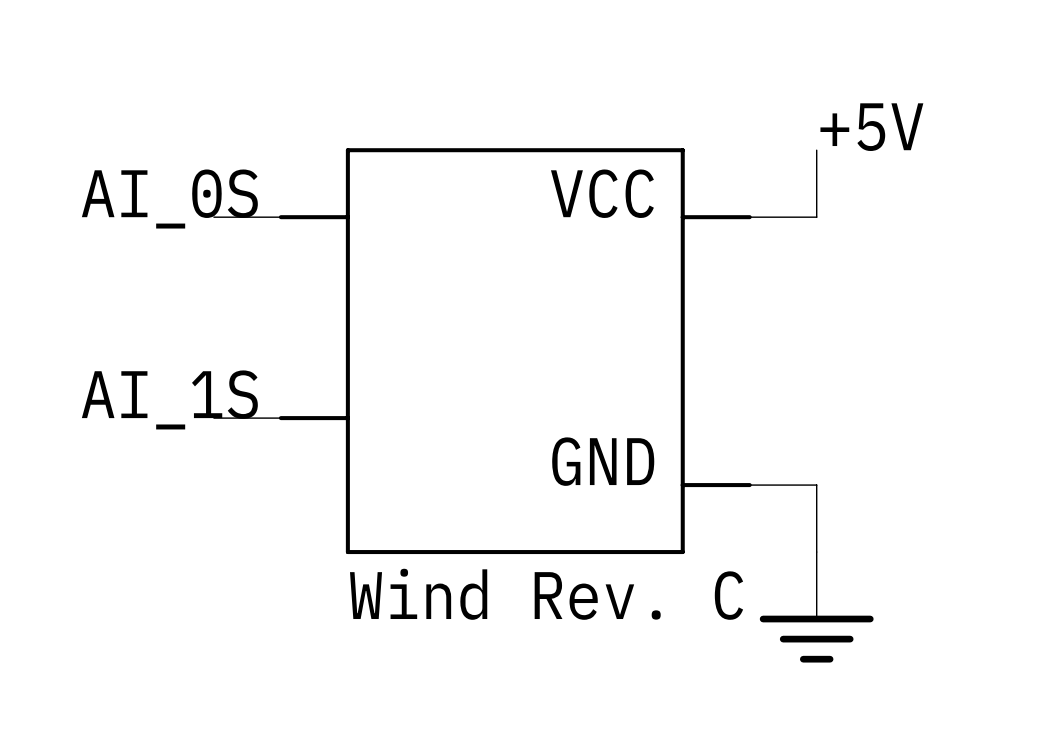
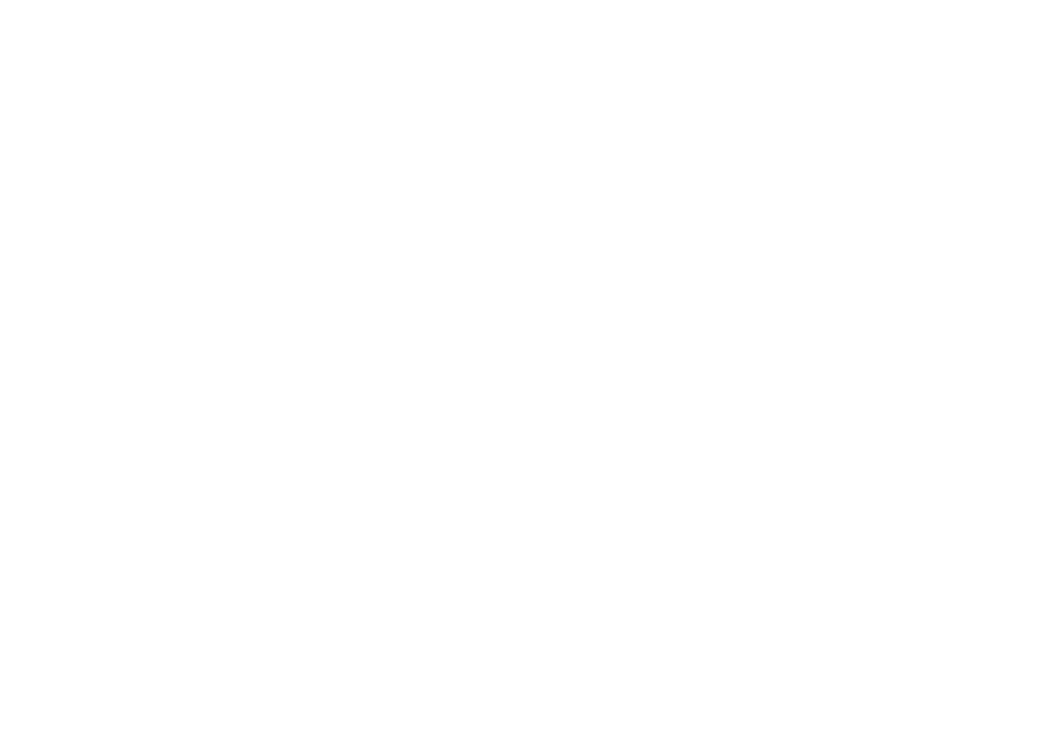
label: +5V (871, 127) -> none
line: (347, 150) (347, 552) (682, 552) (682, 150) (347, 150) -> none
wire: (816, 150) (816, 217) (749, 217) -> none
text: VCC (602, 193) -> none
label: AI_0S (169, 199) -> none
wire: (213, 217) (280, 217) -> none
line: (280, 217) (347, 217) -> none
line: (682, 217) (749, 217) -> none
label: AI_1S (169, 399) -> none
wire: (213, 418) (280, 418) -> none
line: (280, 418) (347, 418) -> none
text: GND (603, 461) -> none
line: (682, 485) (749, 485) -> none
wire: (749, 485) (816, 485) (816, 552) -> none
text: Wind Rev. C (546, 594) -> none
power symbol: (816, 607) -> none

